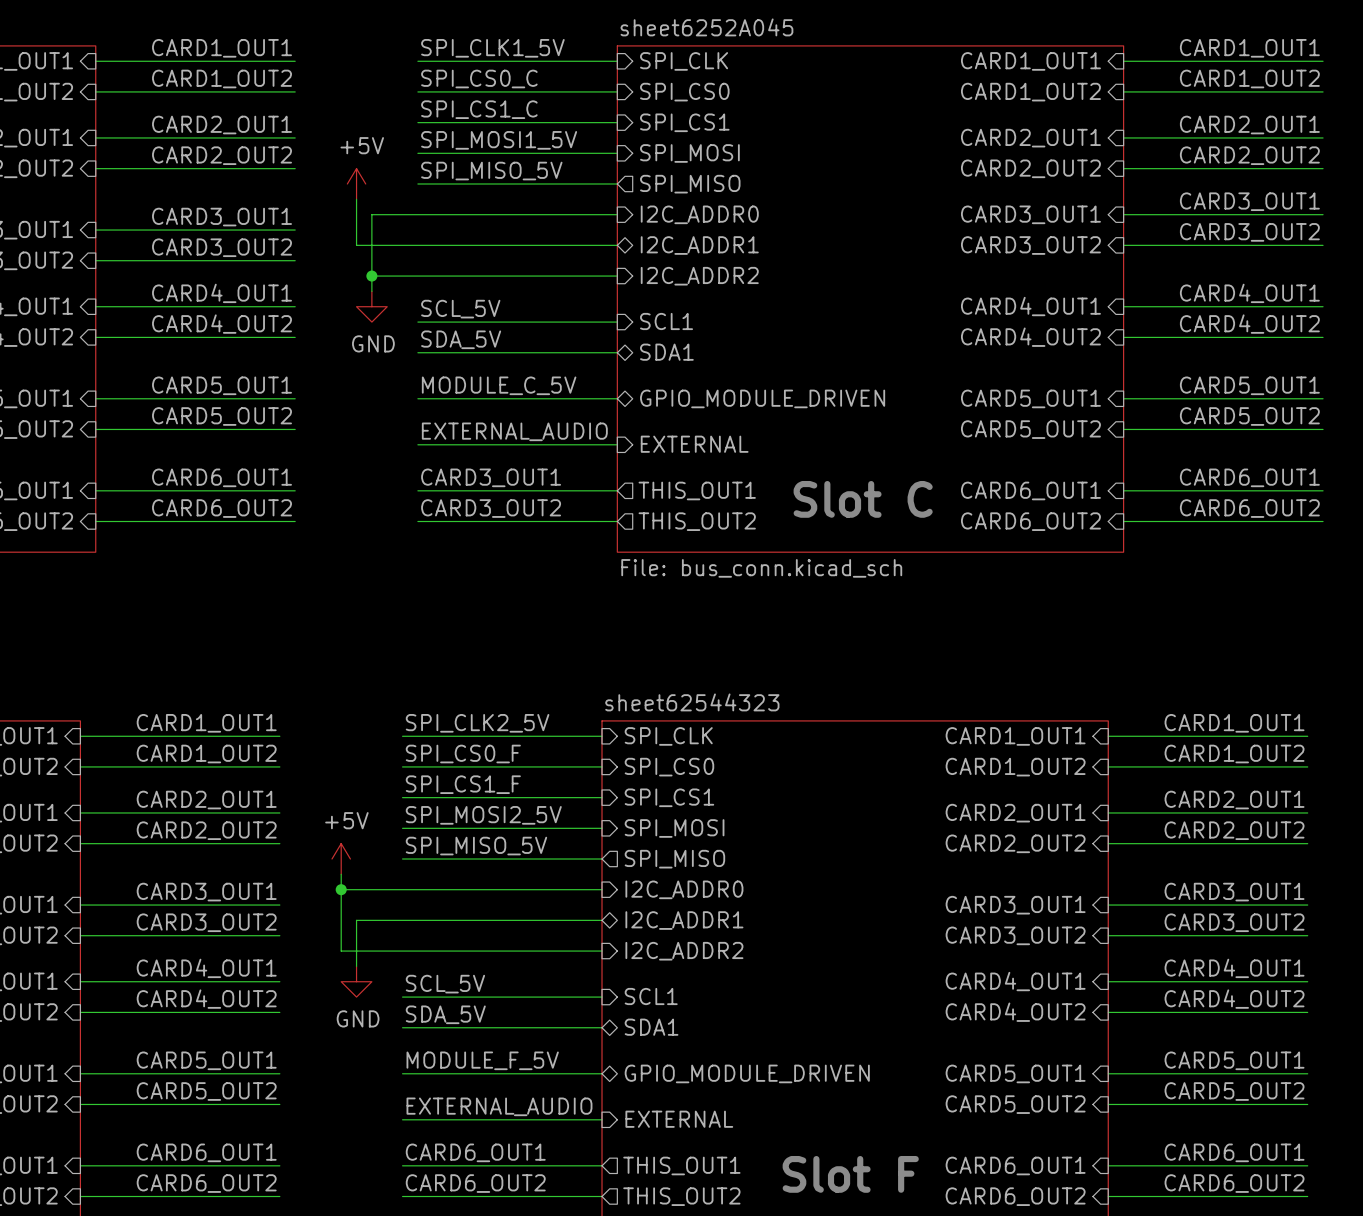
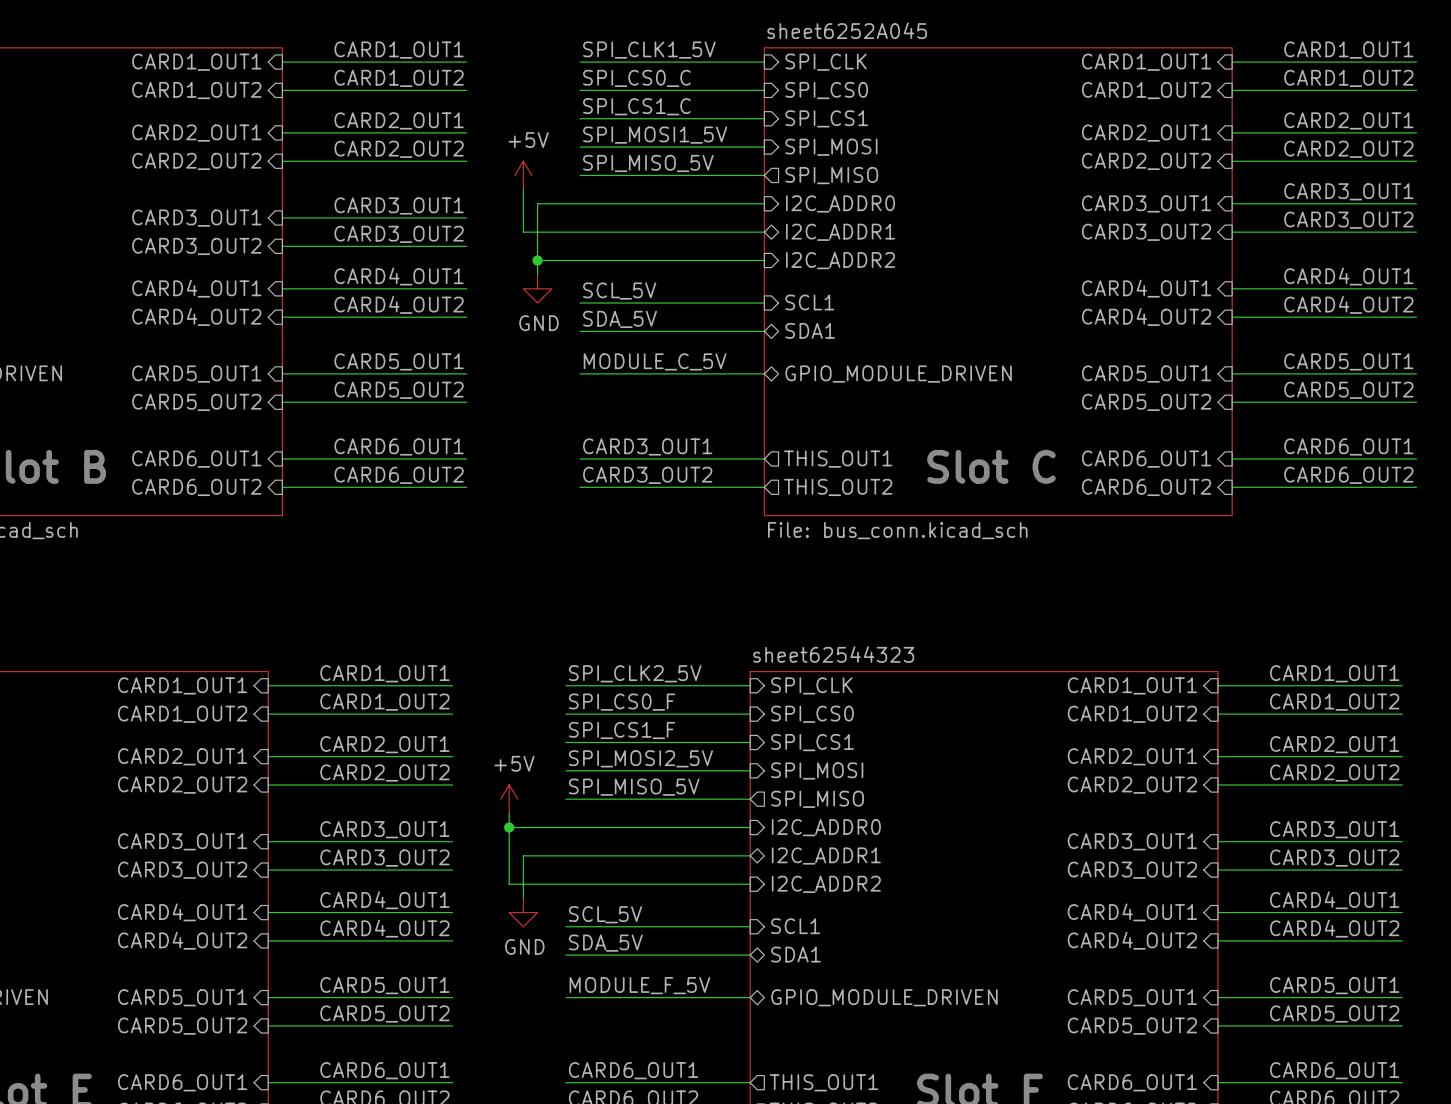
label: EXTERNAL_AUDIO (514, 431) -> none
wire: (417, 444) (617, 444) -> none
sheet pin: EXTERNAL (694, 444) -> none
label: EXTERNAL_AUDIO (499, 1106) -> none
wire: (402, 1119) (602, 1119) -> none
sheet pin: EXTERNAL (679, 1119) -> none

